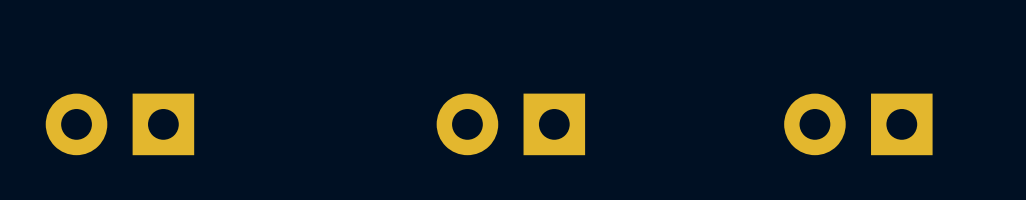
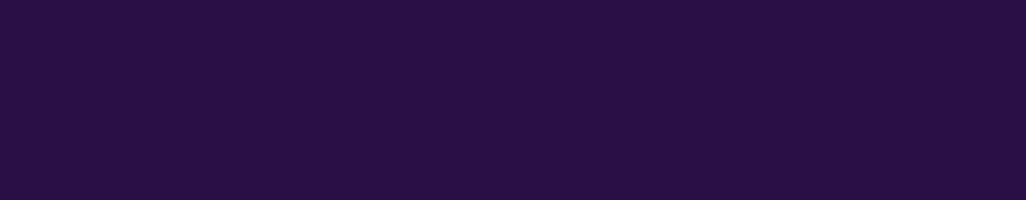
part: (119, 124) -> none
part: (510, 124) -> none
part: (858, 124) -> none

